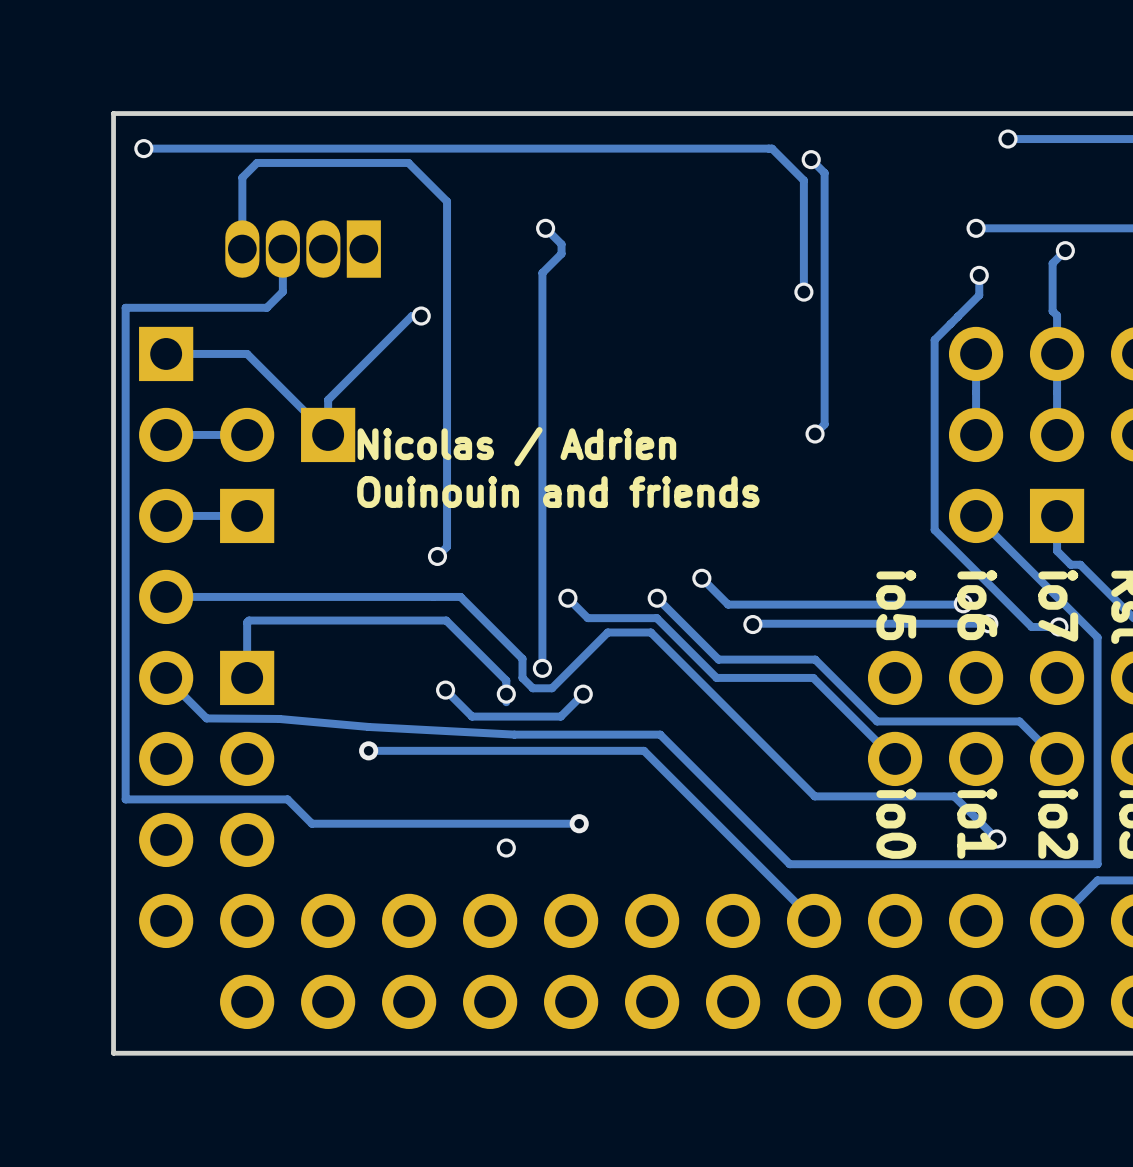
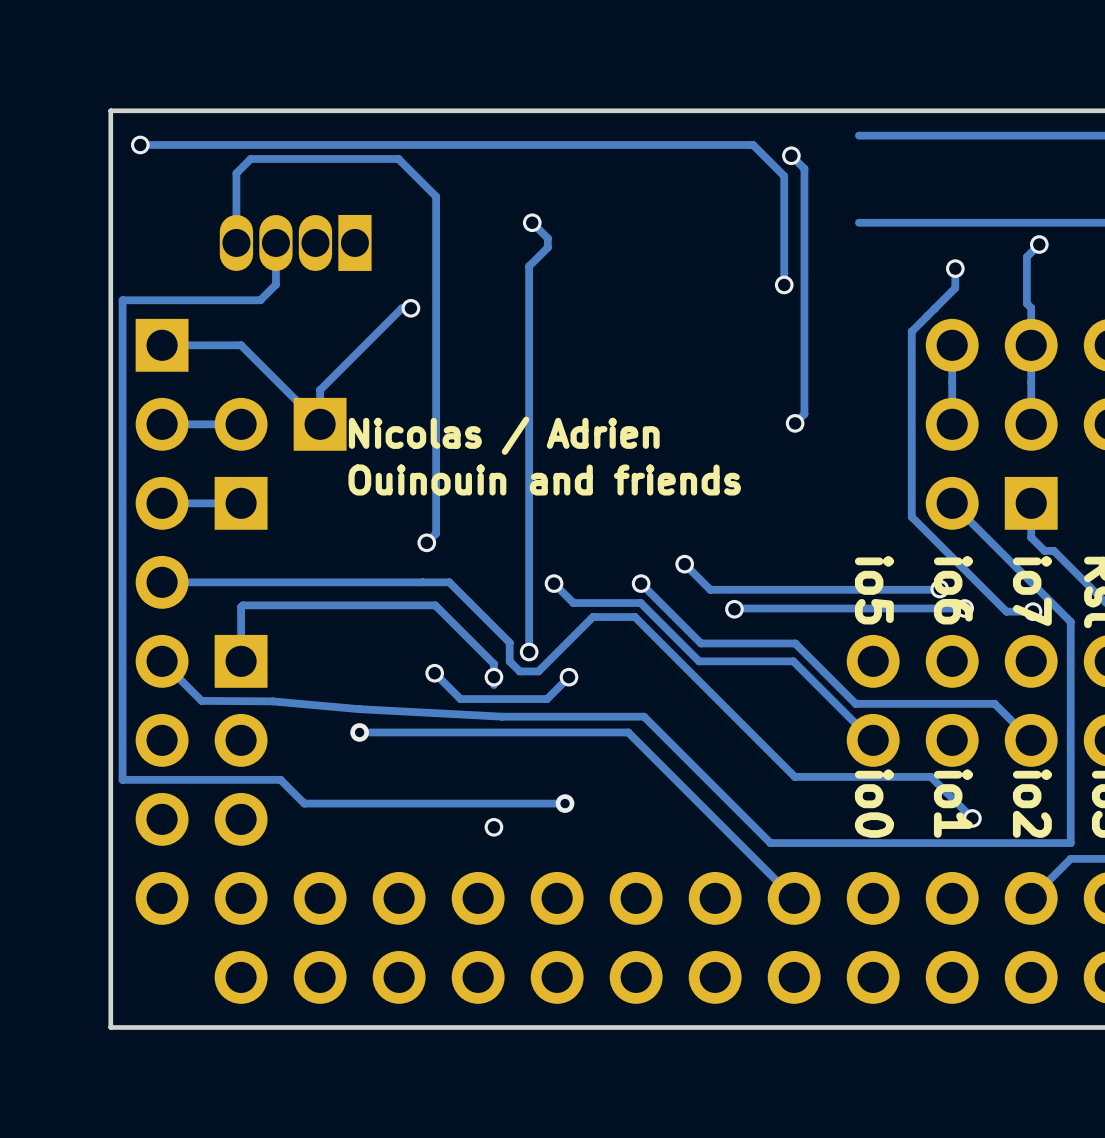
track: none -> (983, 135) (858, 135)
via: (1007, 139) -> none
track: none -> (952, 222) (858, 222)
via: (976, 228) -> none

